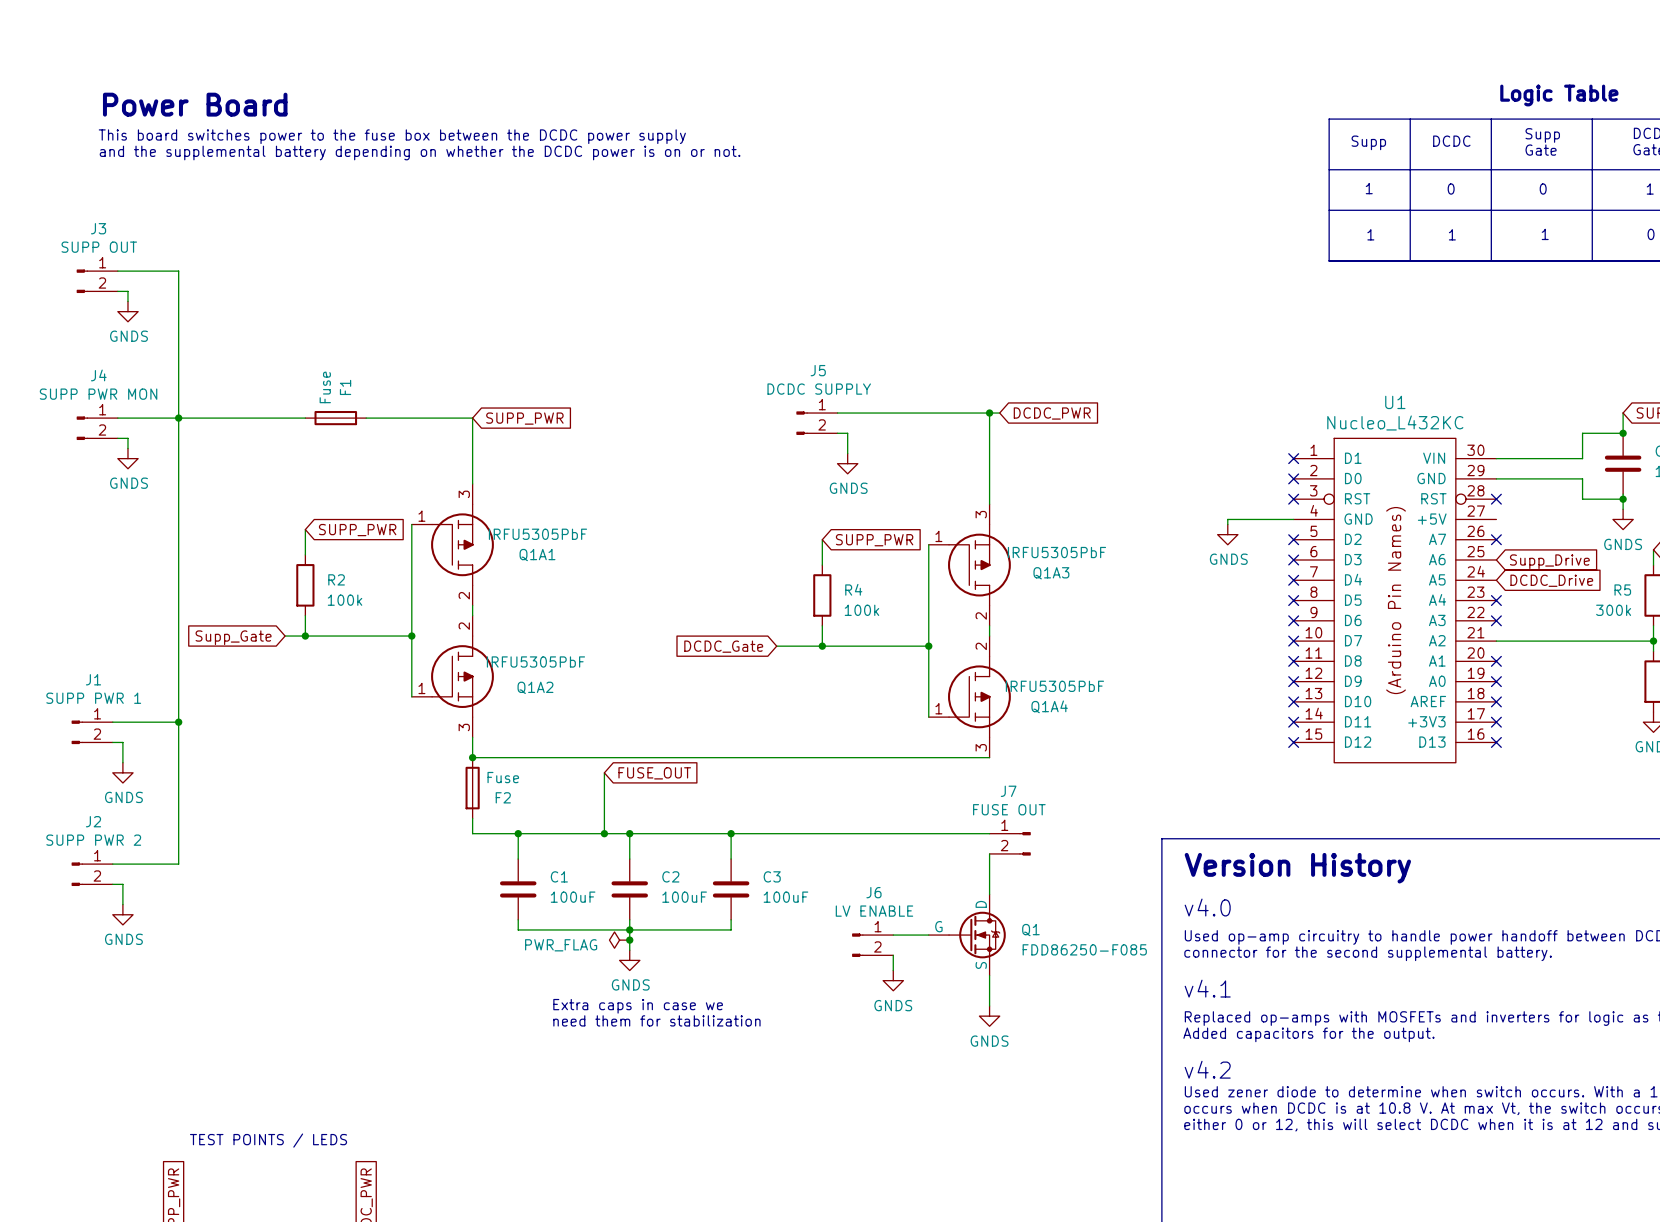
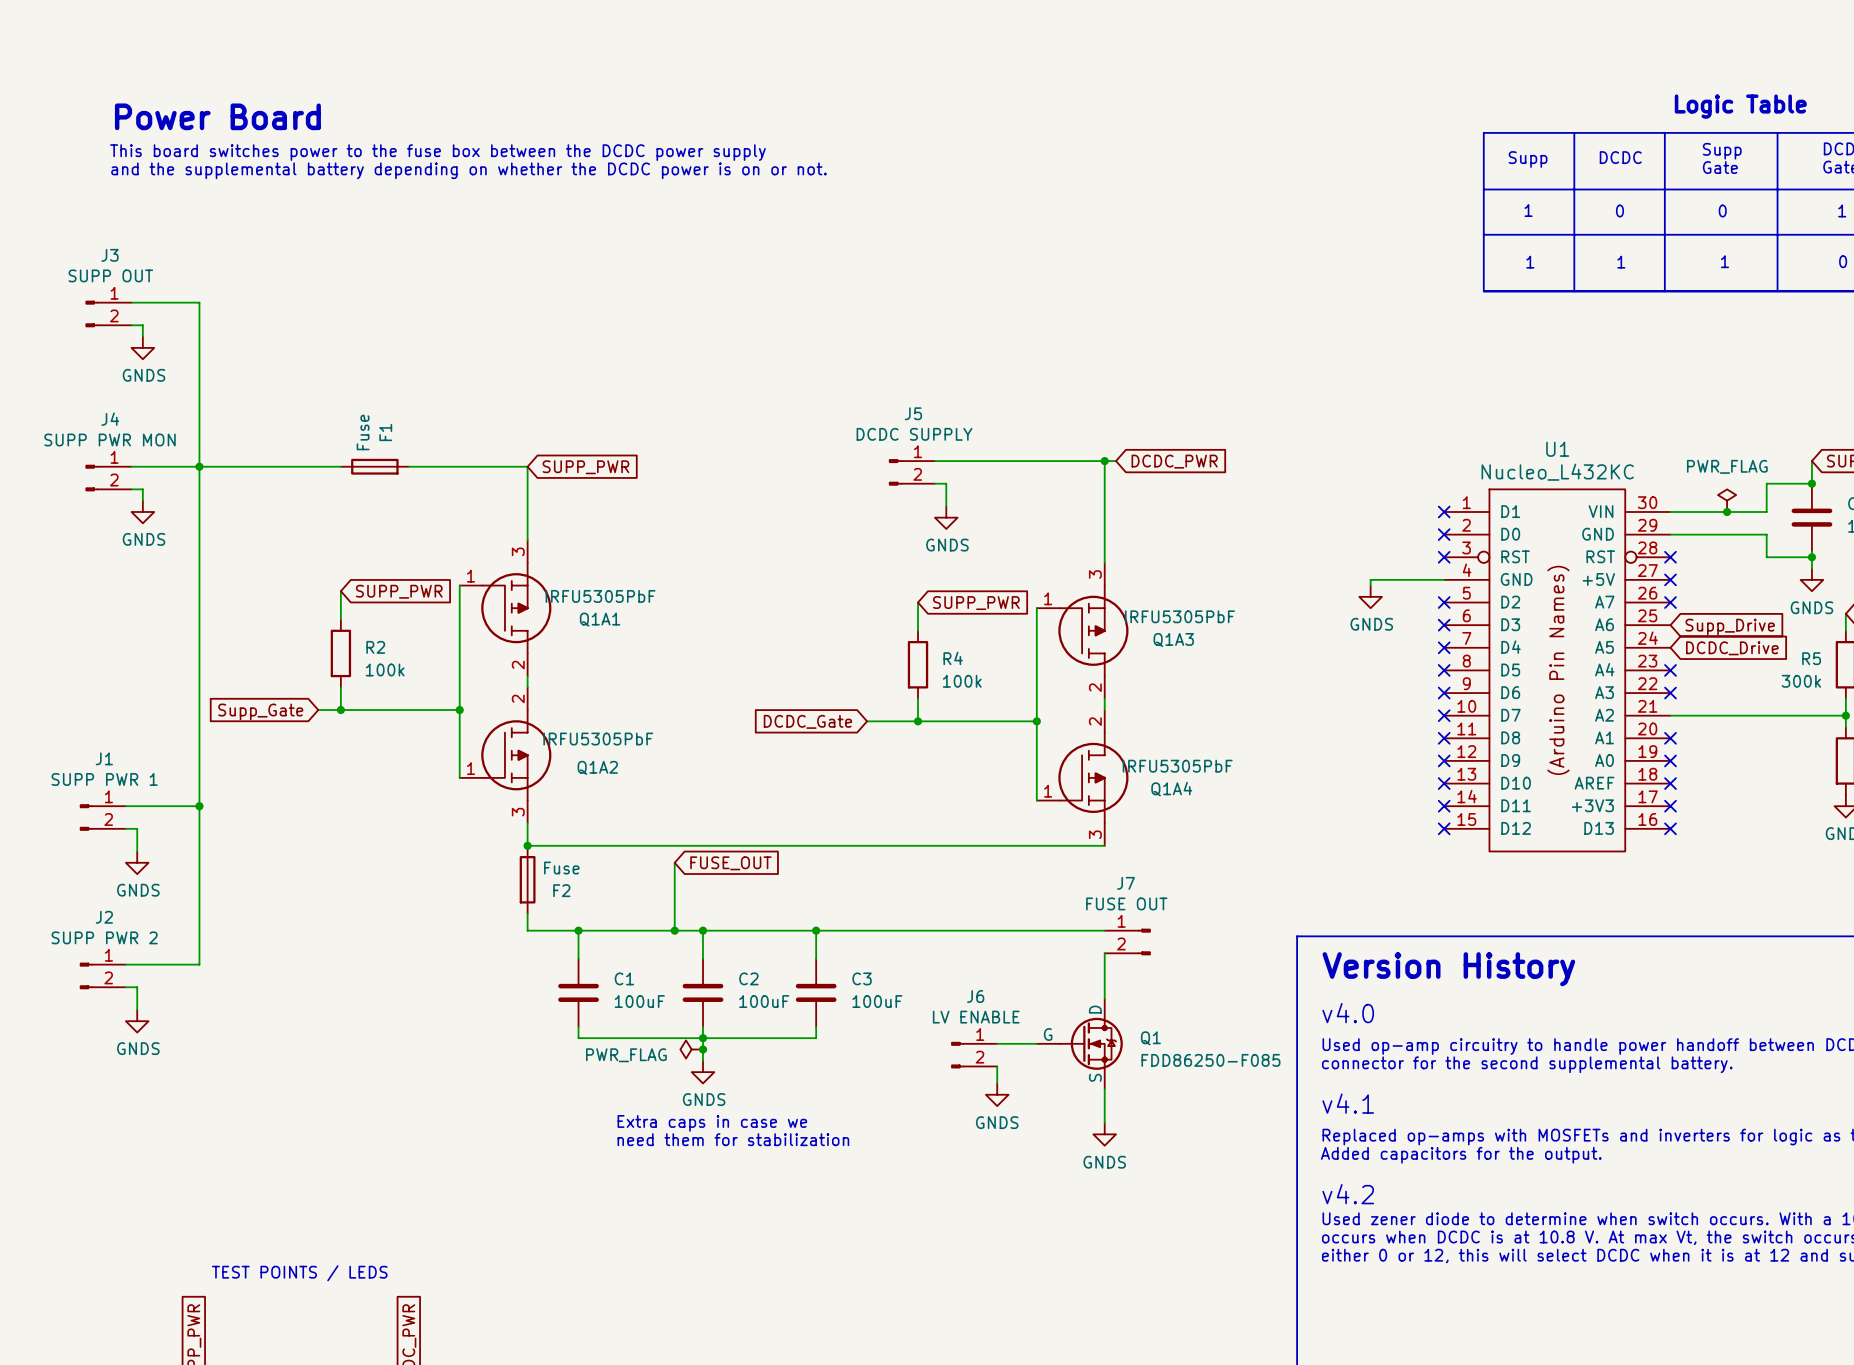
power symbol: none -> PWR_FLAG (1727, 500)
junction: none -> (1727, 511)
no-connect mark: none -> (1670, 579)

